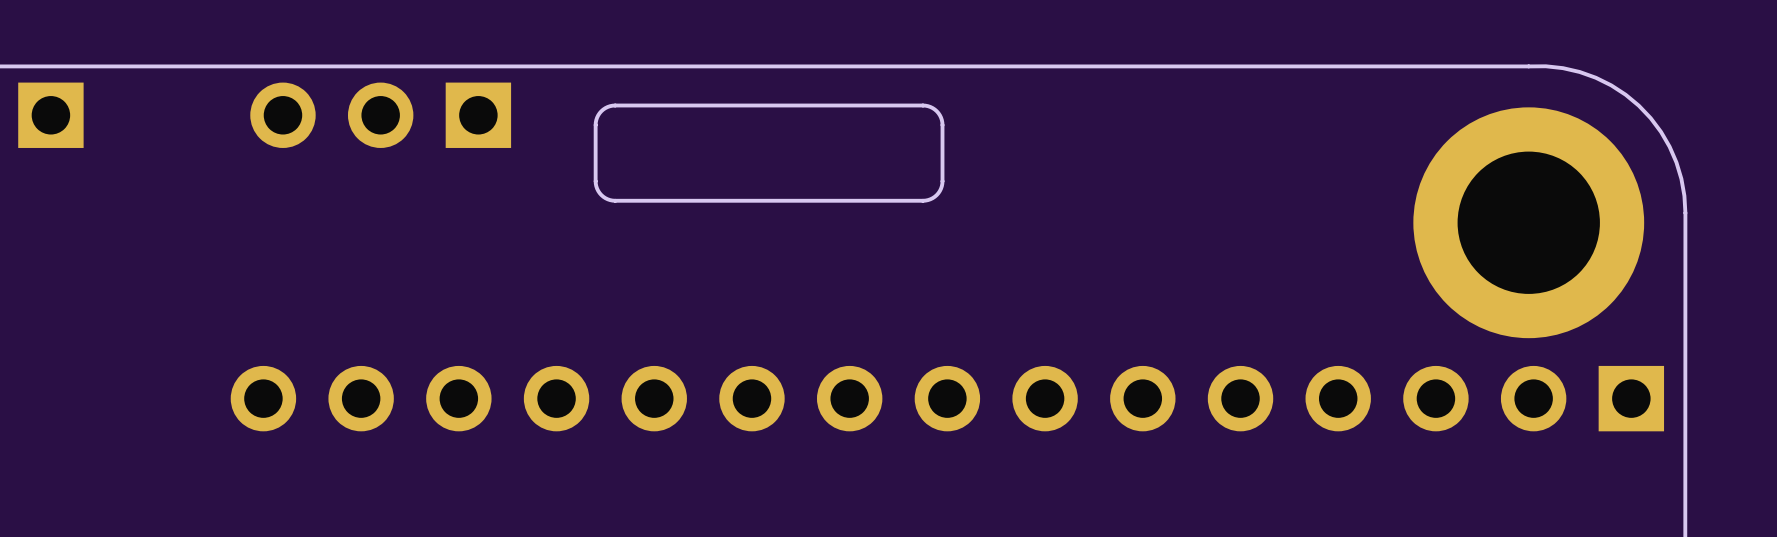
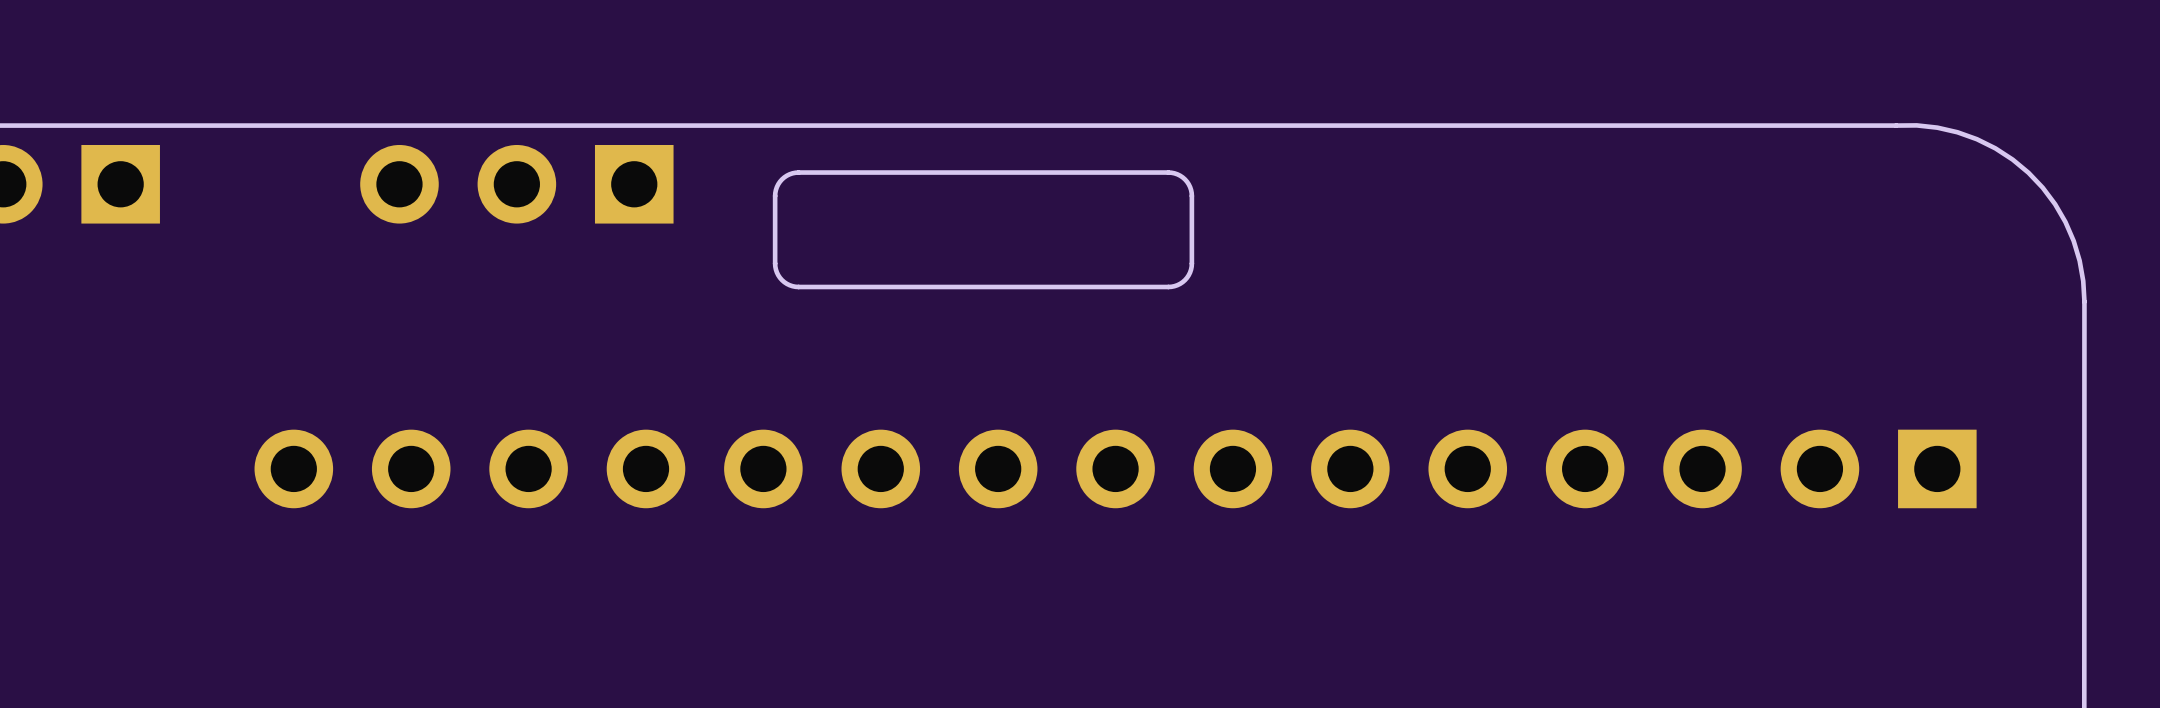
part: (1528, 222) -> none
part position: (947, 398) -> (1115, 468)

